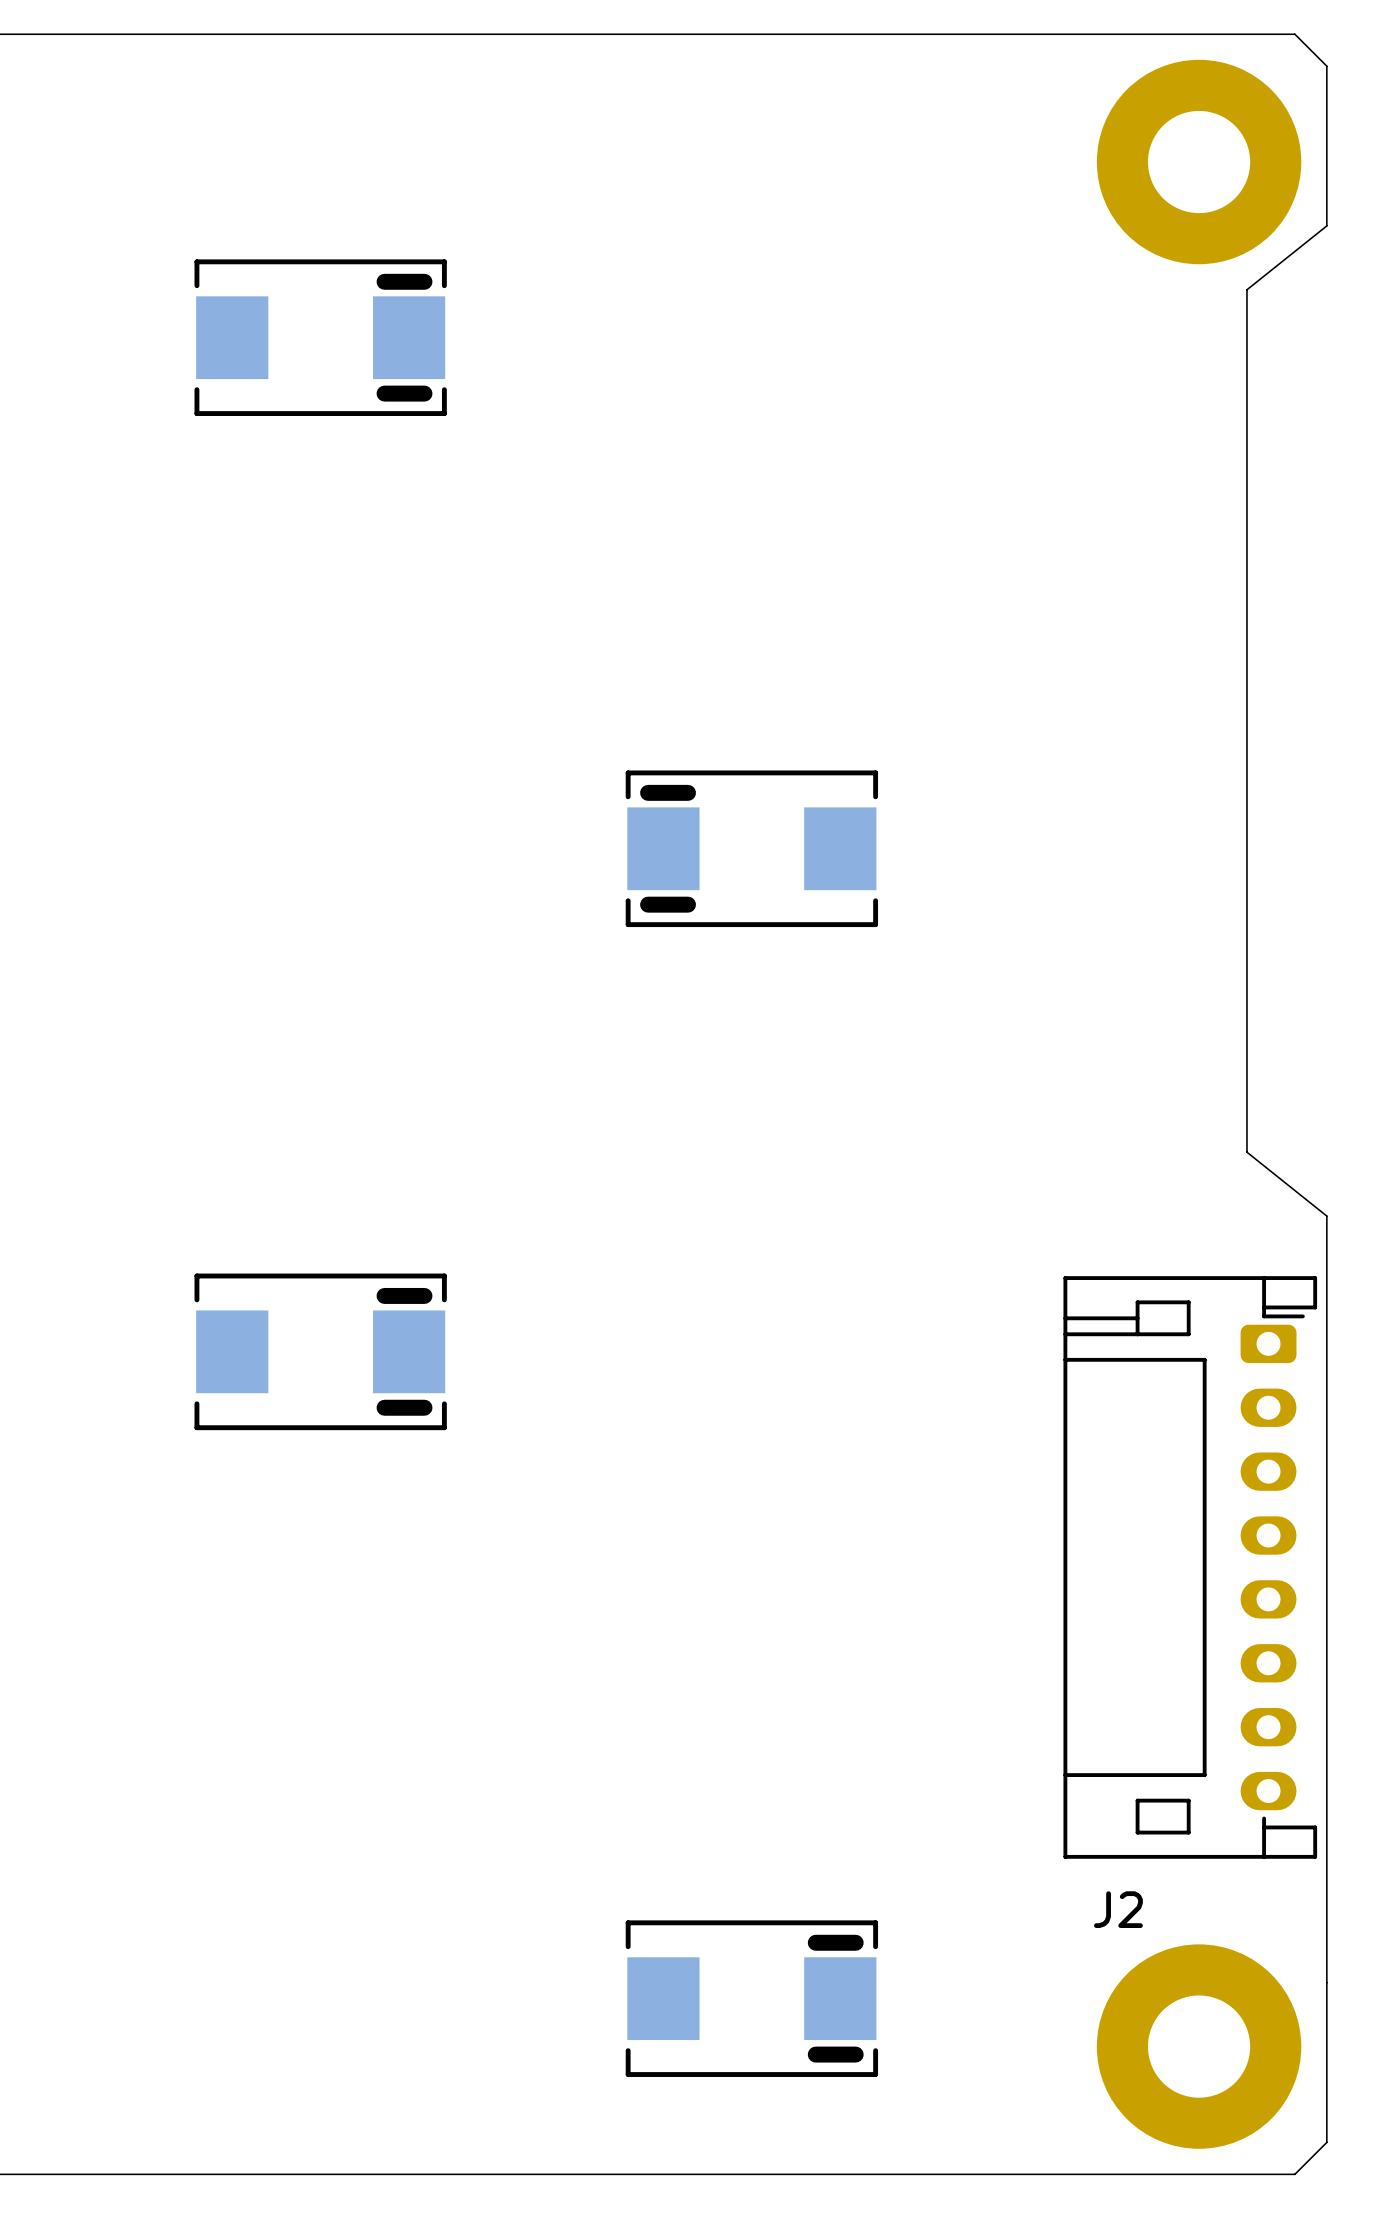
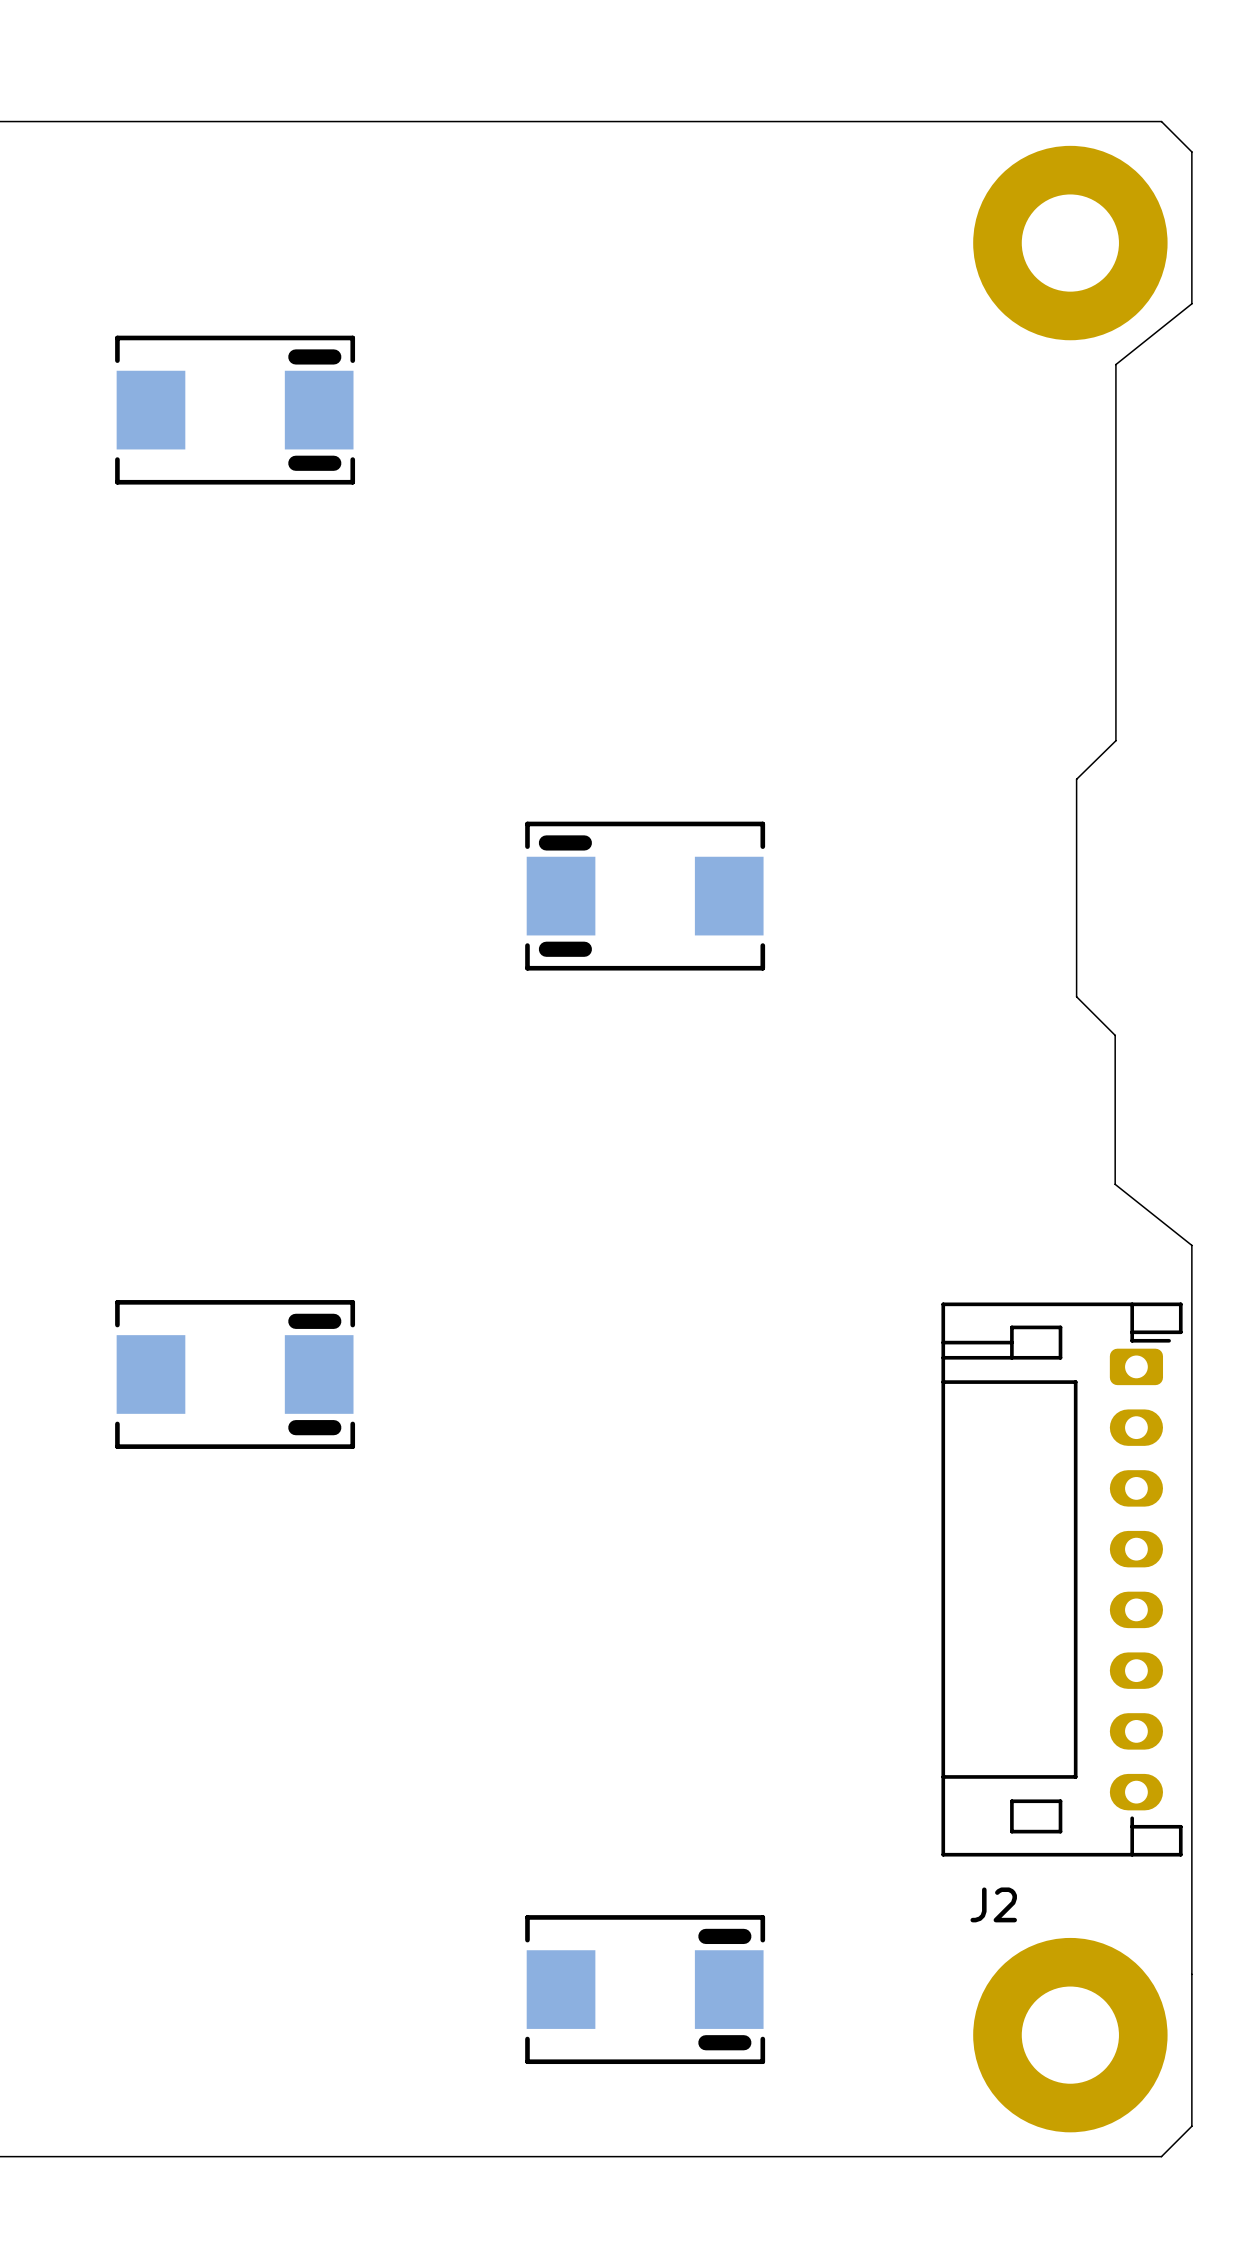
board edge: (1246, 685) (1246, 1152) (1326, 1216) -> (1115, 740) (1076, 779) (1076, 996) (1115, 1035) (1115, 1184) (1191, 1245)

